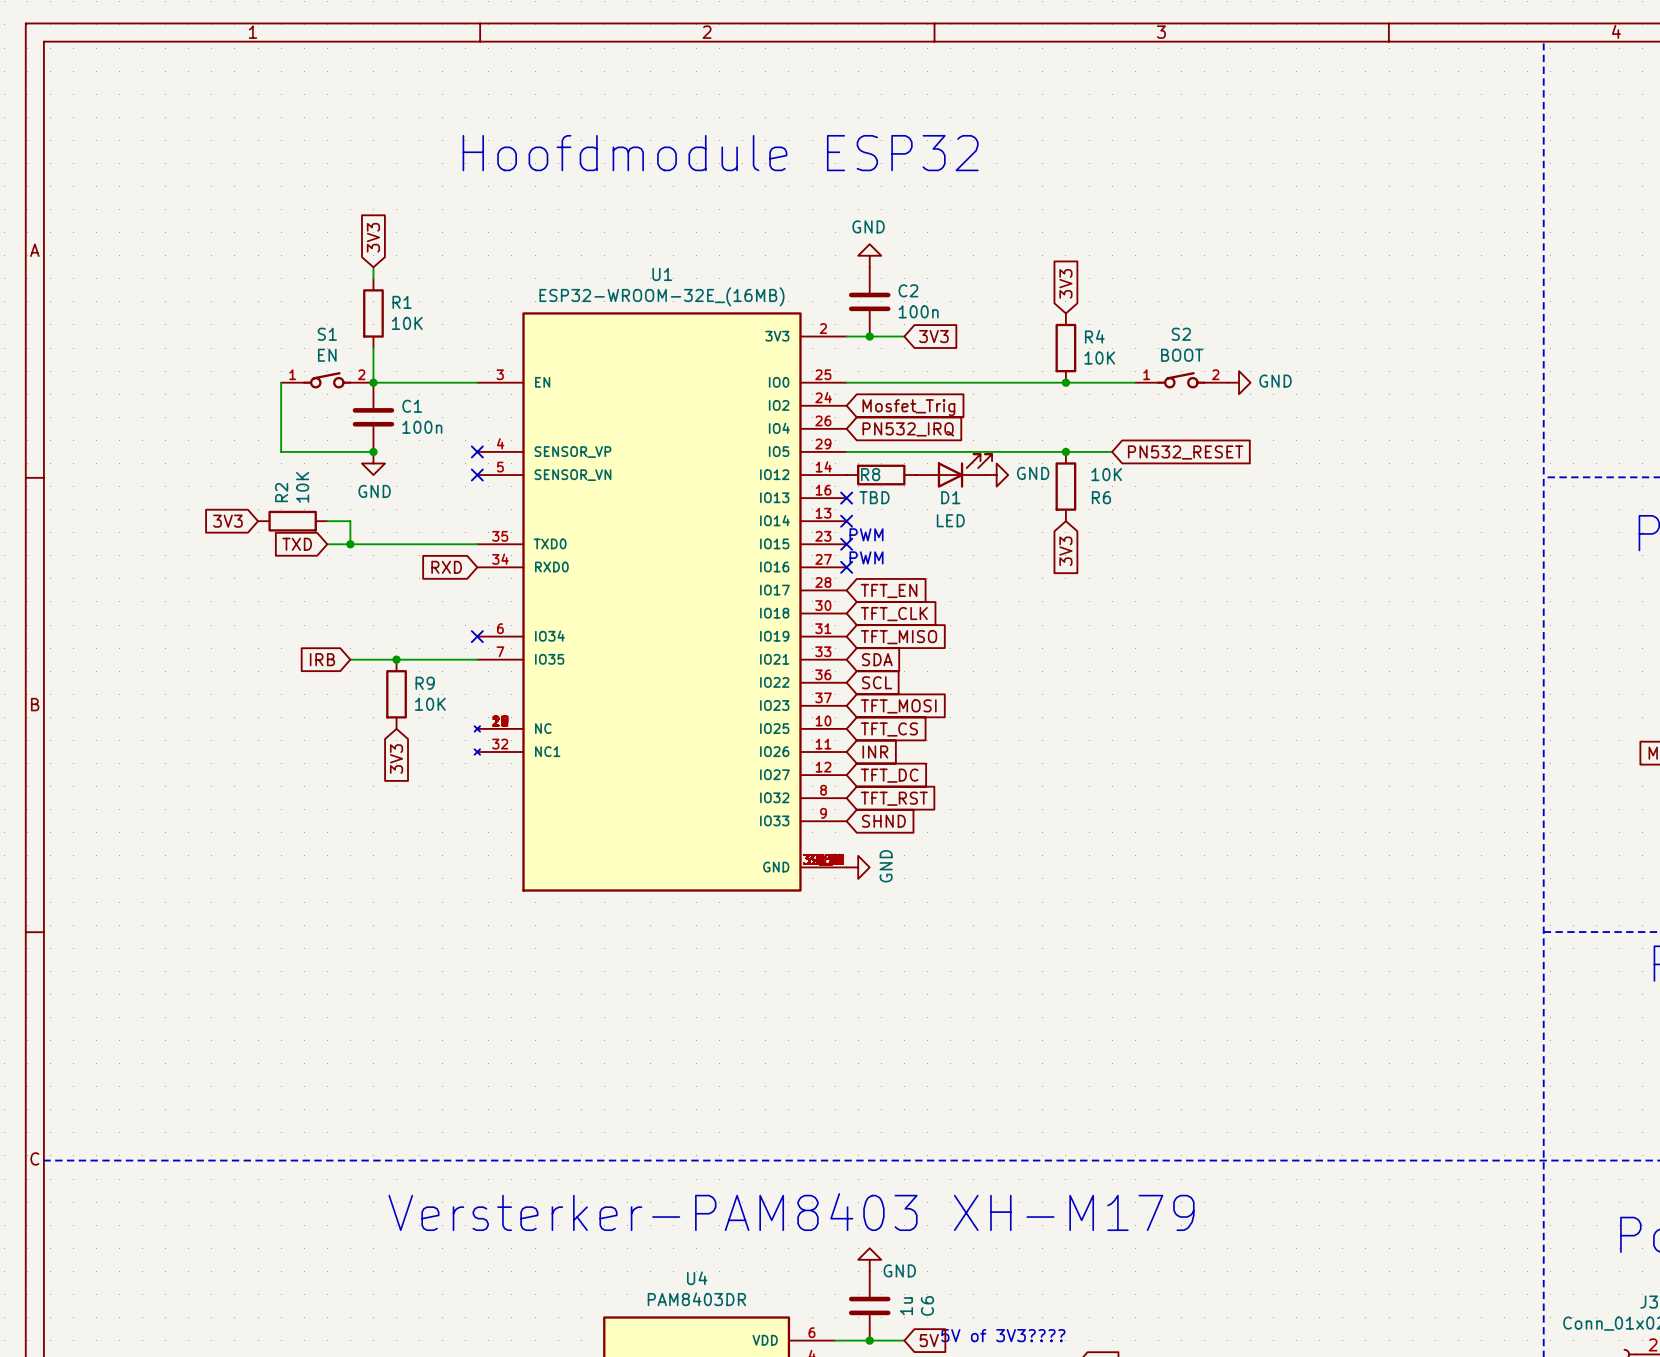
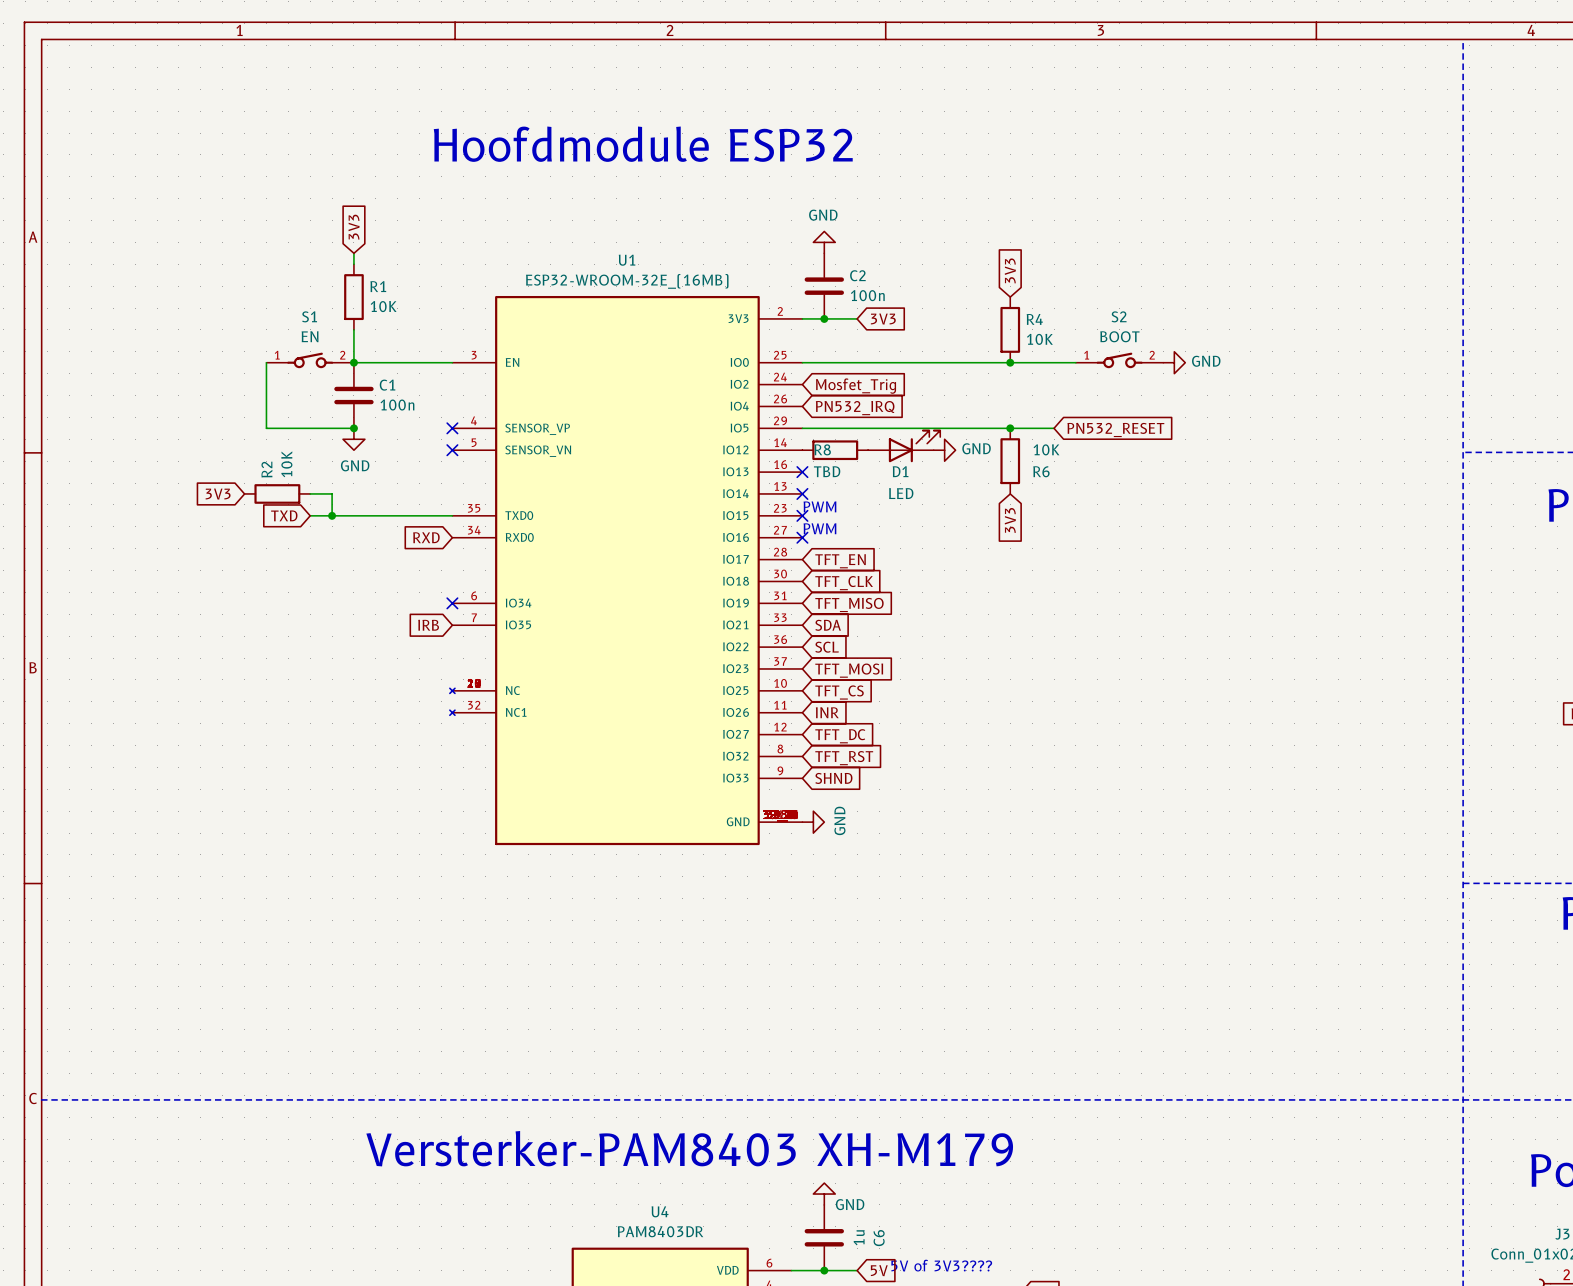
global label position: IRB (322, 659) -> IRB (428, 625)
wire: (350, 659) (477, 659) -> none
junction: (396, 659) -> none
R9: 10K (396, 694) -> none
global label: 3V3 (396, 759) -> none

